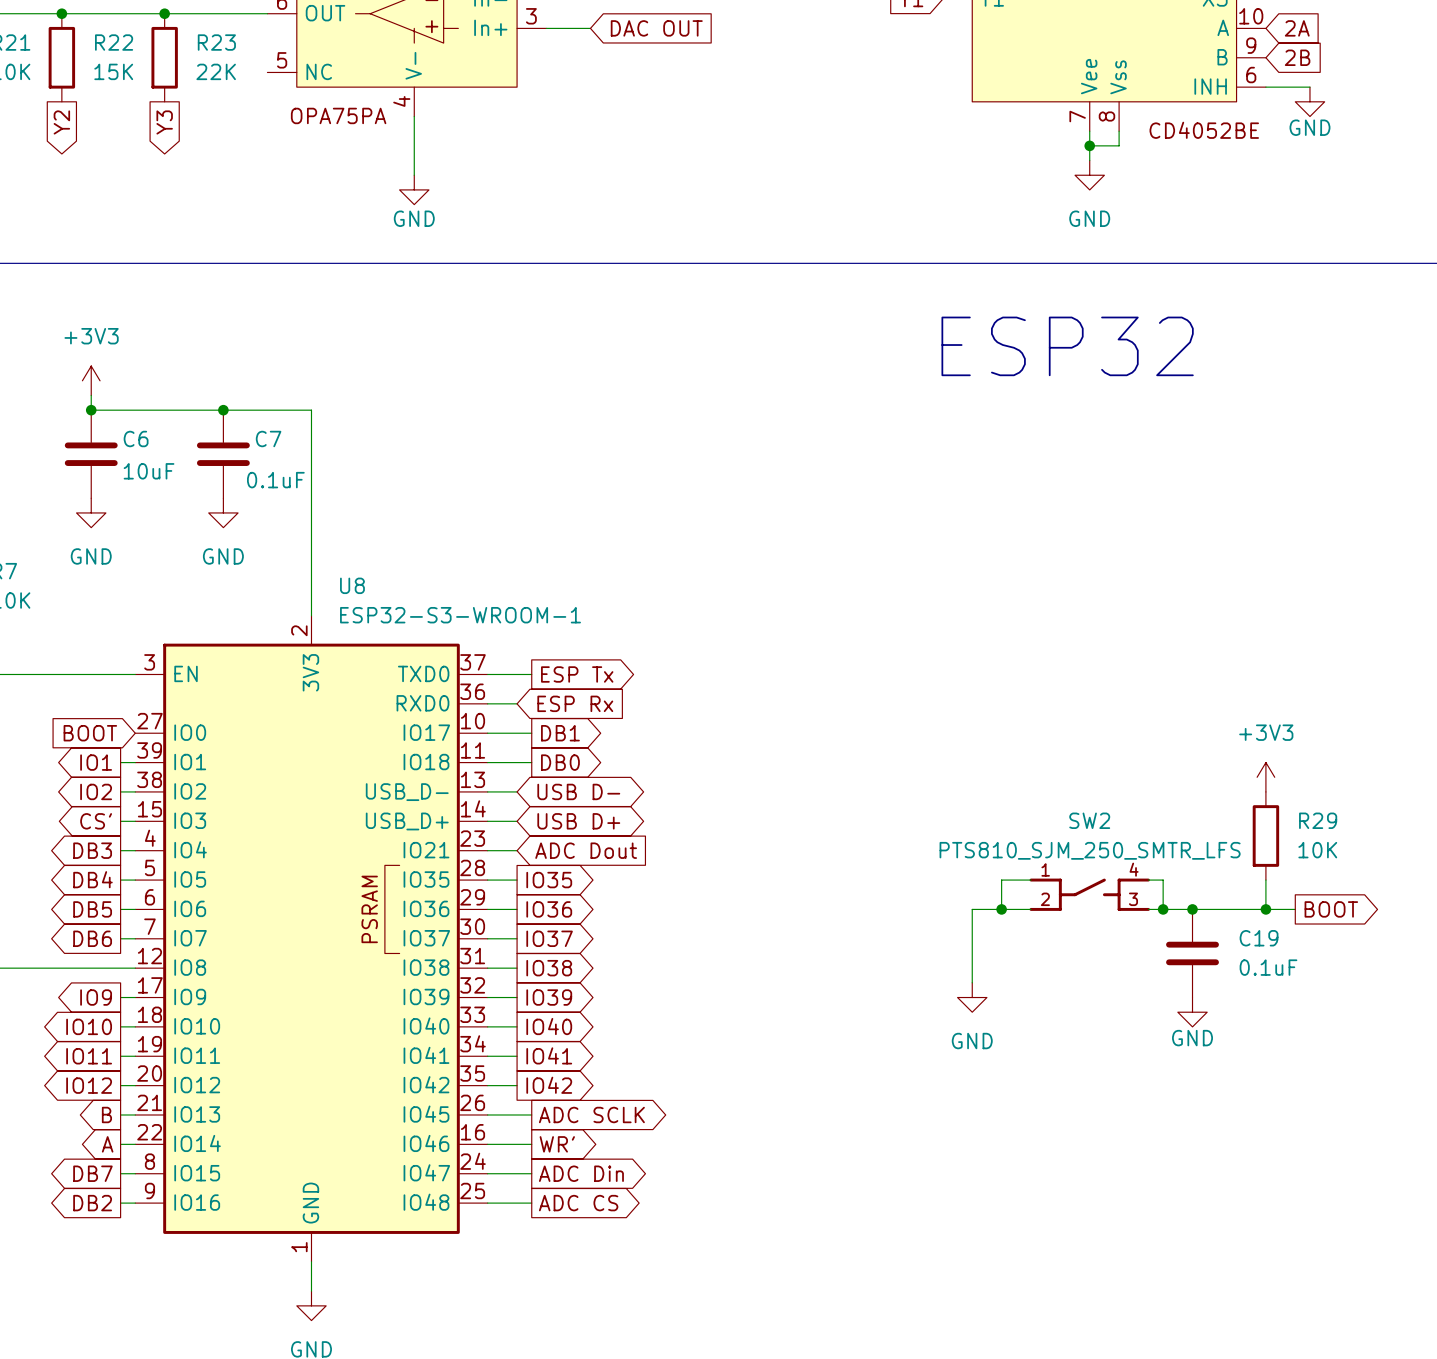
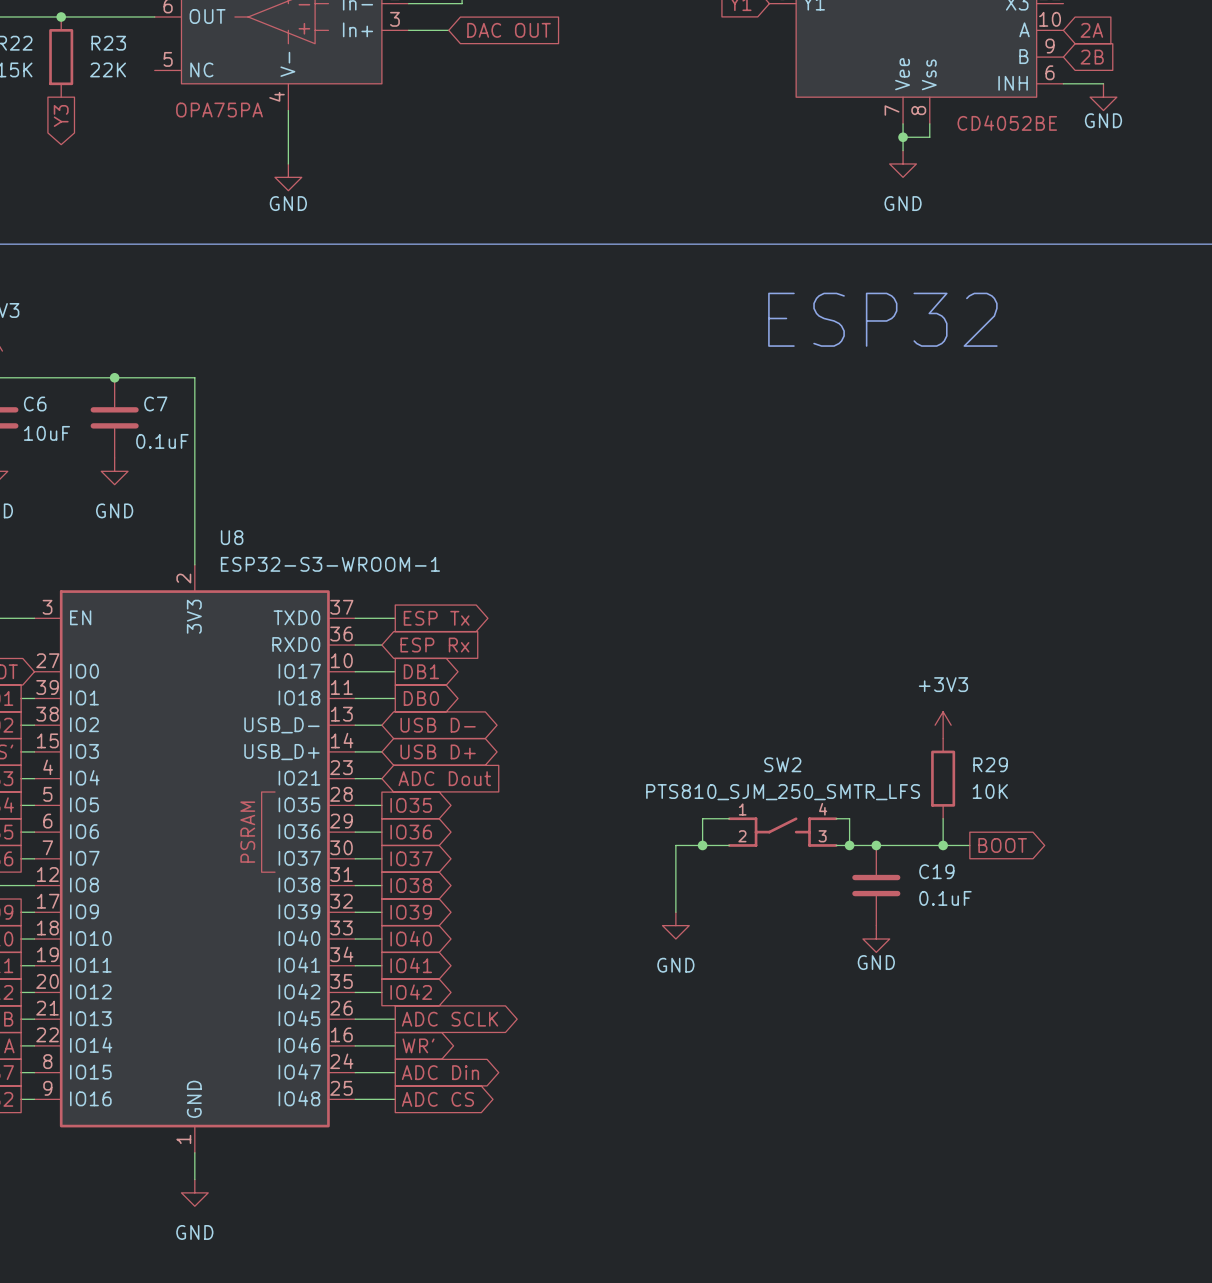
power symbol position: +3V3 (1265, 777) -> +3V3 (943, 725)
R29 position: (1265, 836) -> (943, 778)
wire: (1030, 880) (1001, 880) (1001, 909) -> (729, 818) (702, 818) (702, 845)
wire: (1148, 880) (1163, 880) (1163, 909) -> (836, 818) (849, 818) (849, 845)
wire: (1265, 880) (1265, 909) -> (943, 818) (943, 845)
SW2 position: (1089, 894) -> (782, 832)
junction: (1001, 909) -> none
wire: (1030, 909) (972, 909) (972, 982) -> (729, 845) (675, 845) (675, 912)
wire: (1148, 909) (1295, 909) -> (836, 845) (969, 845)
junction: (1163, 909) -> none
junction: (1192, 909) -> none
junction: (1265, 909) -> none
global label position: BOOT (1331, 909) -> BOOT (1002, 845)
junction: none -> (702, 845)
junction: none -> (849, 845)
junction: none -> (876, 845)
junction: none -> (943, 845)
C19 position: (1192, 953) -> (876, 885)
power symbol: GND (972, 997) -> none
power symbol: none -> GND (675, 925)
power symbol: GND (1192, 1012) -> none
power symbol: none -> GND (876, 939)

